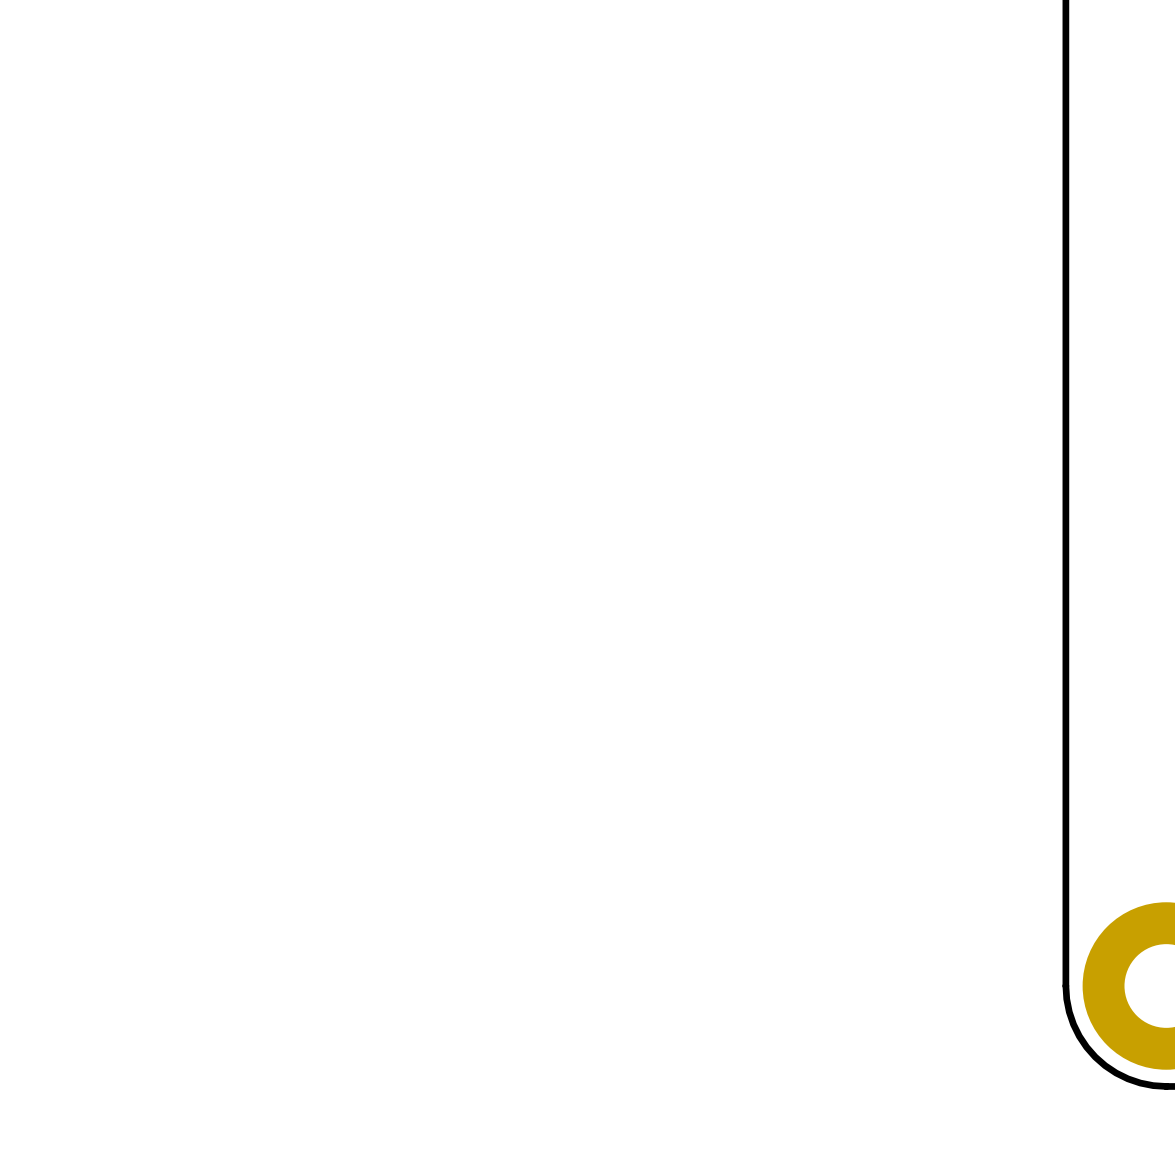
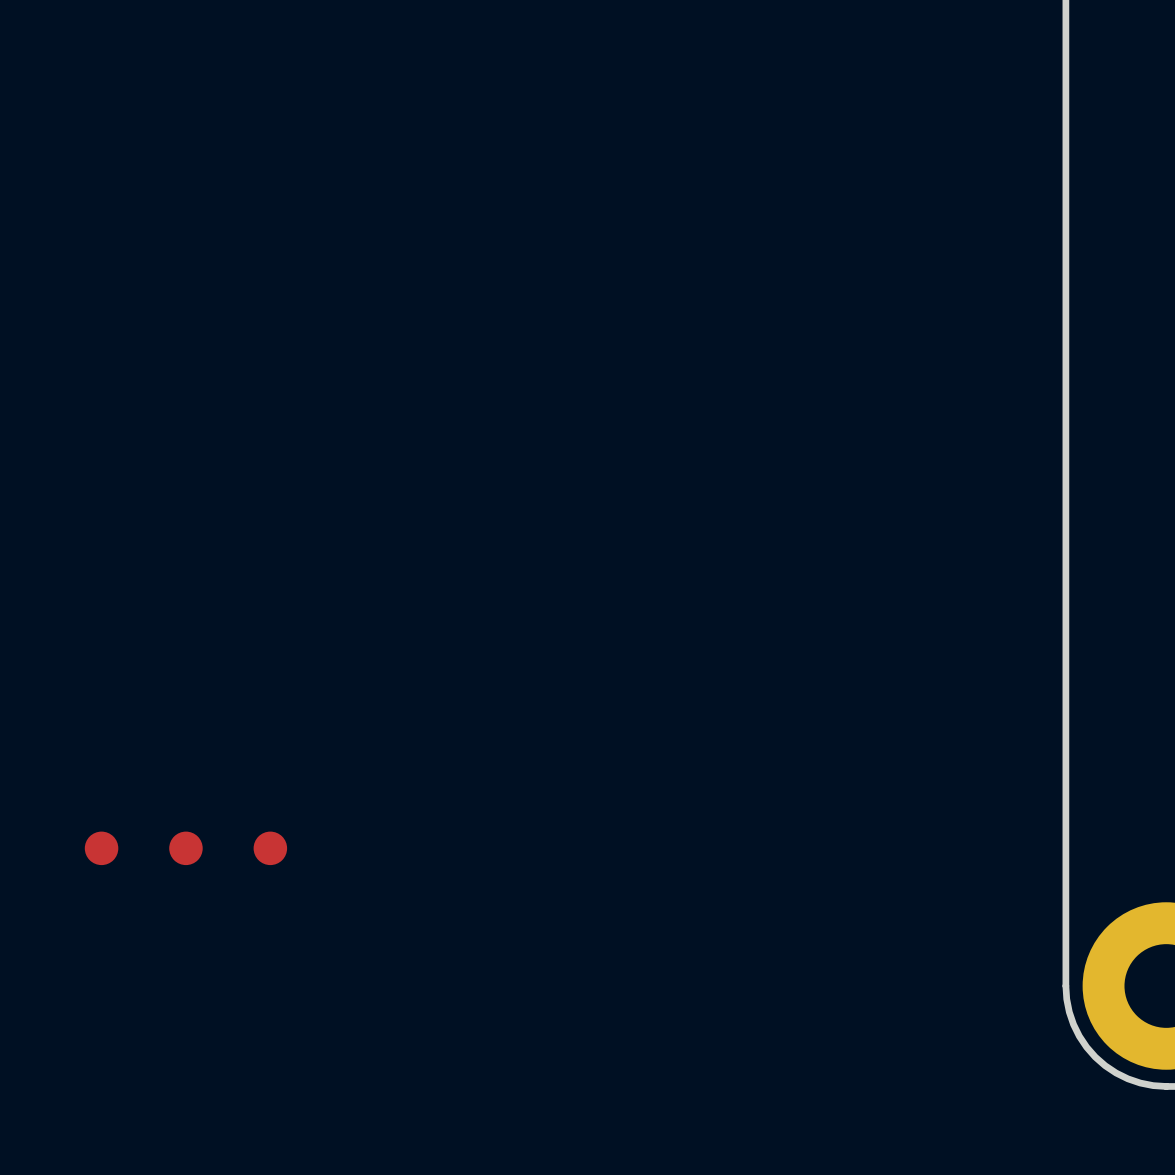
part: none -> (101, 848)
part: none -> (185, 848)
part: none -> (270, 848)

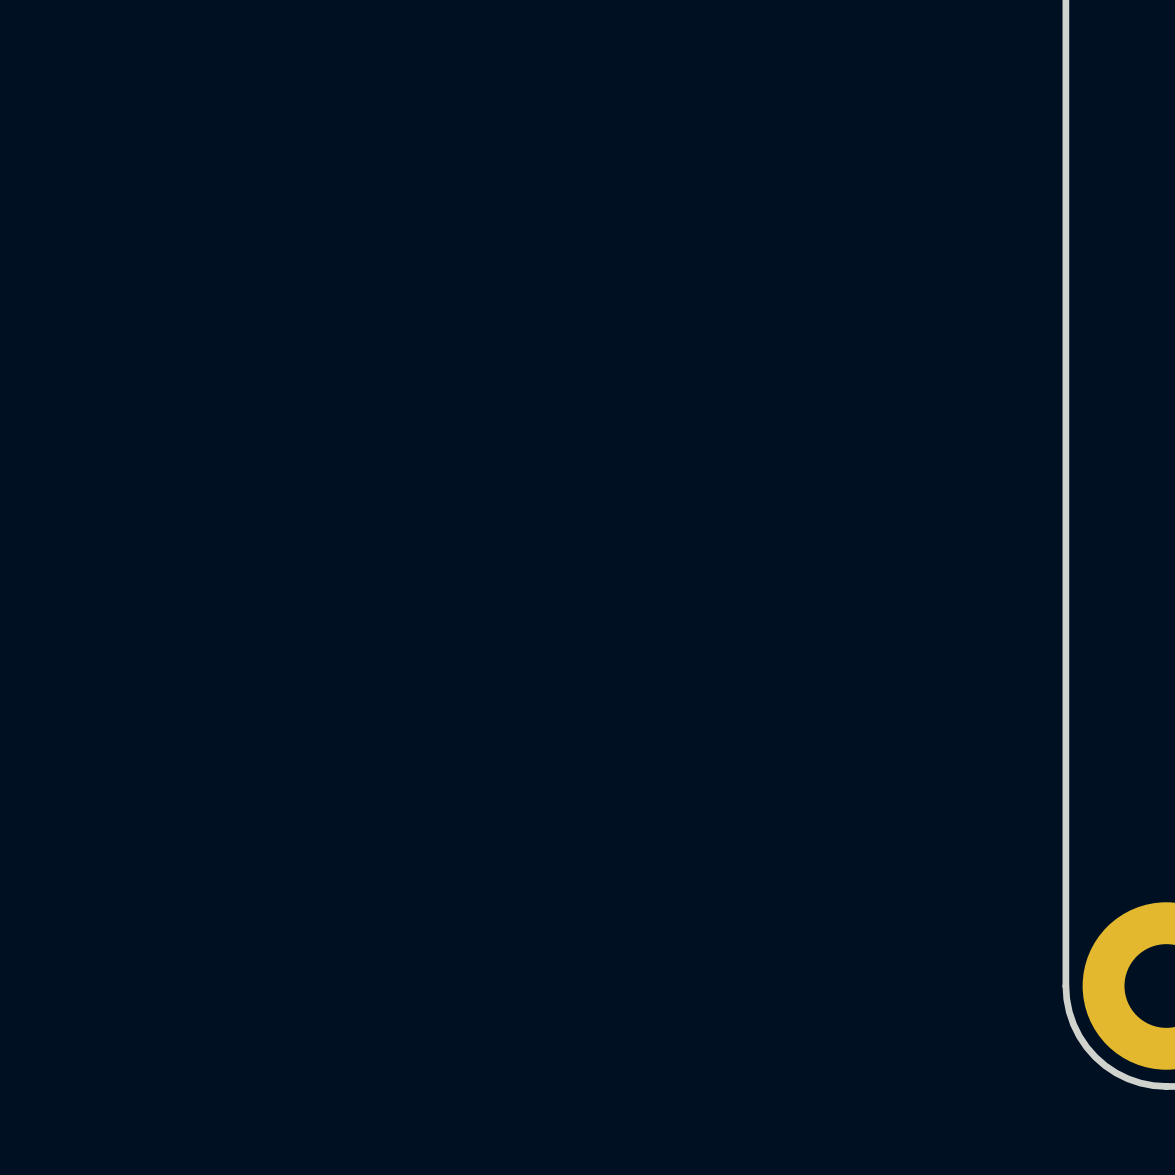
part: (101, 848) -> none
part: (185, 848) -> none
part: (270, 848) -> none

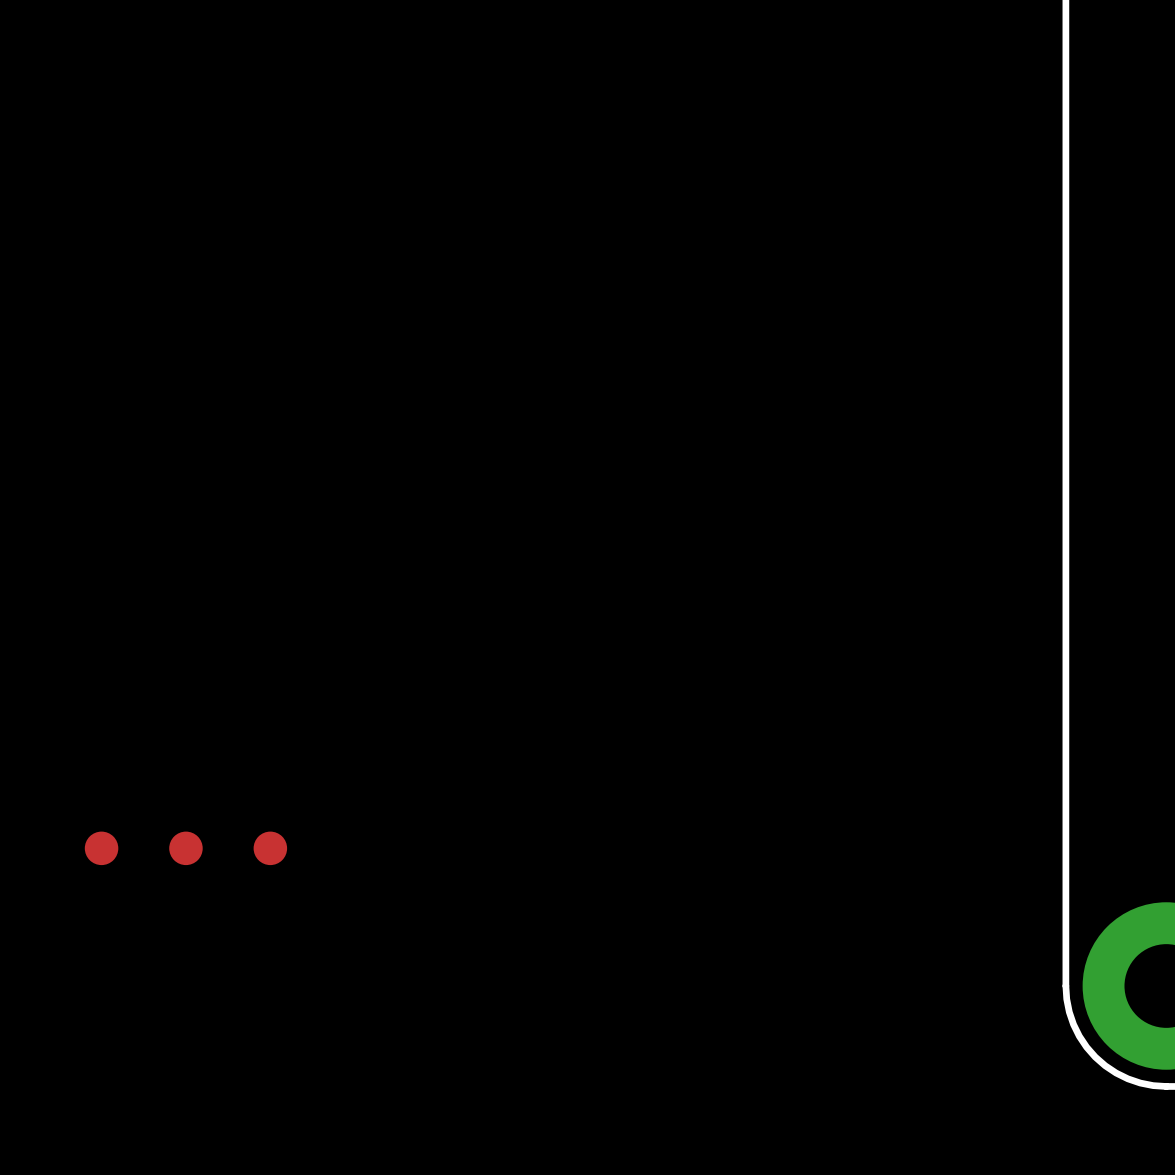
part: none -> (101, 848)
part: none -> (185, 848)
part: none -> (270, 848)

